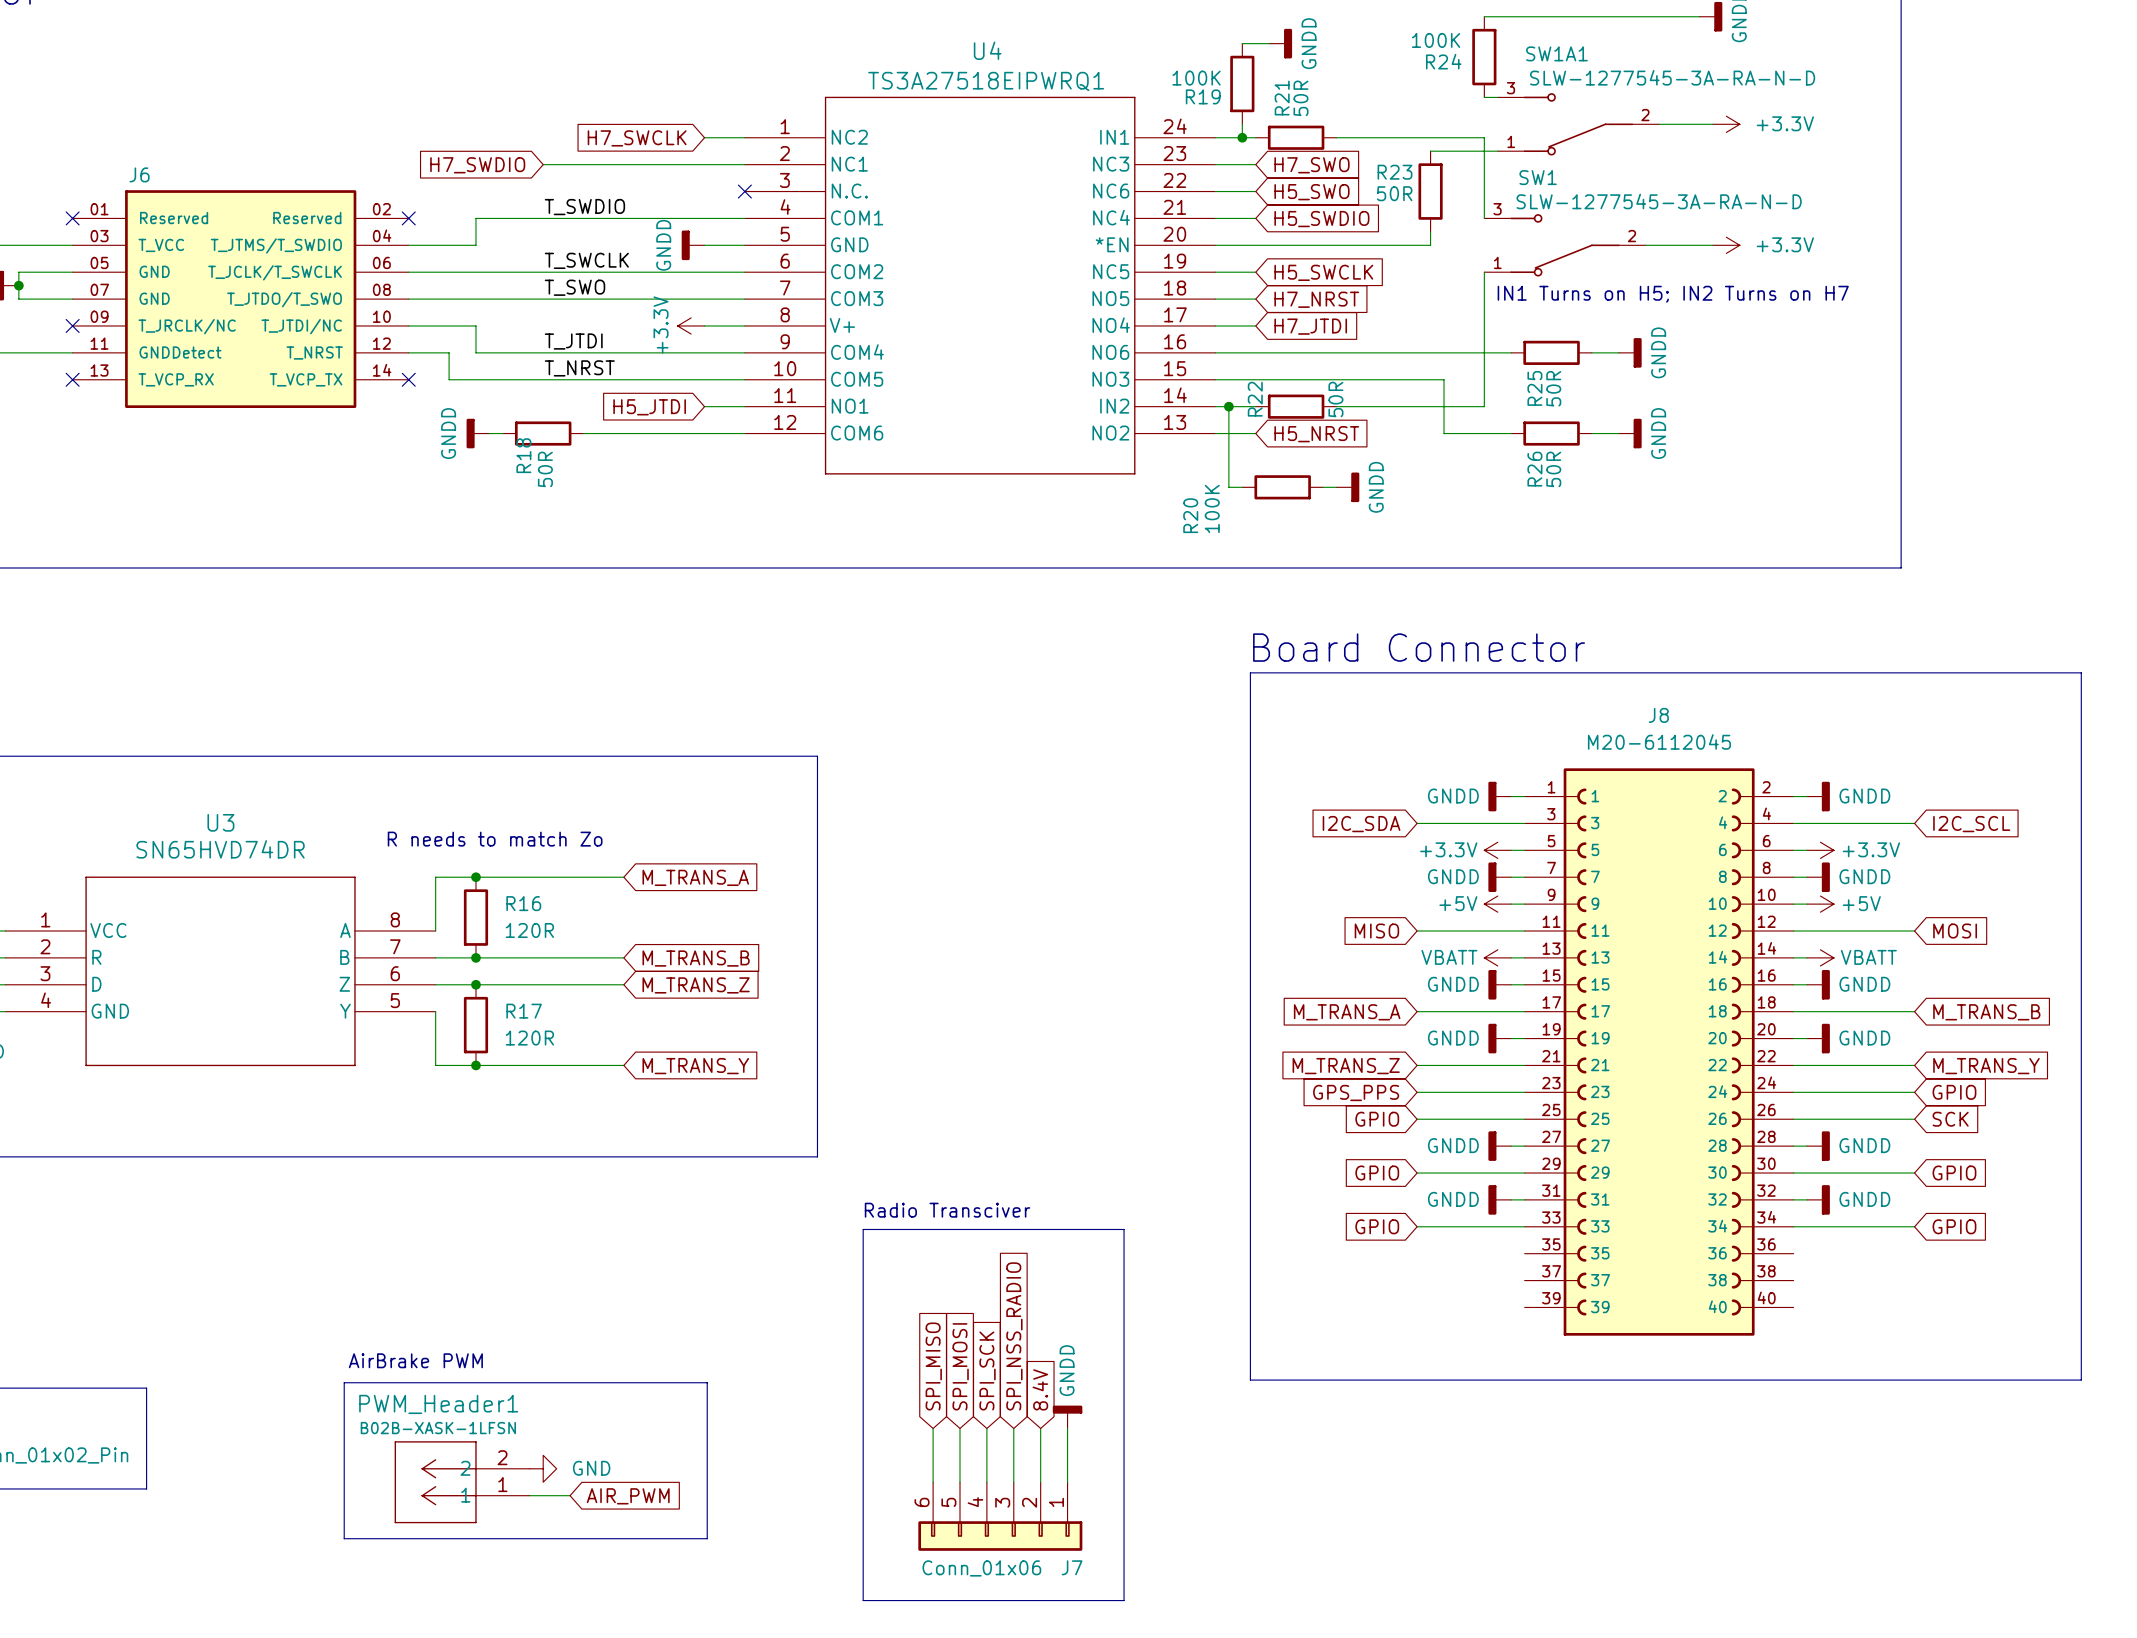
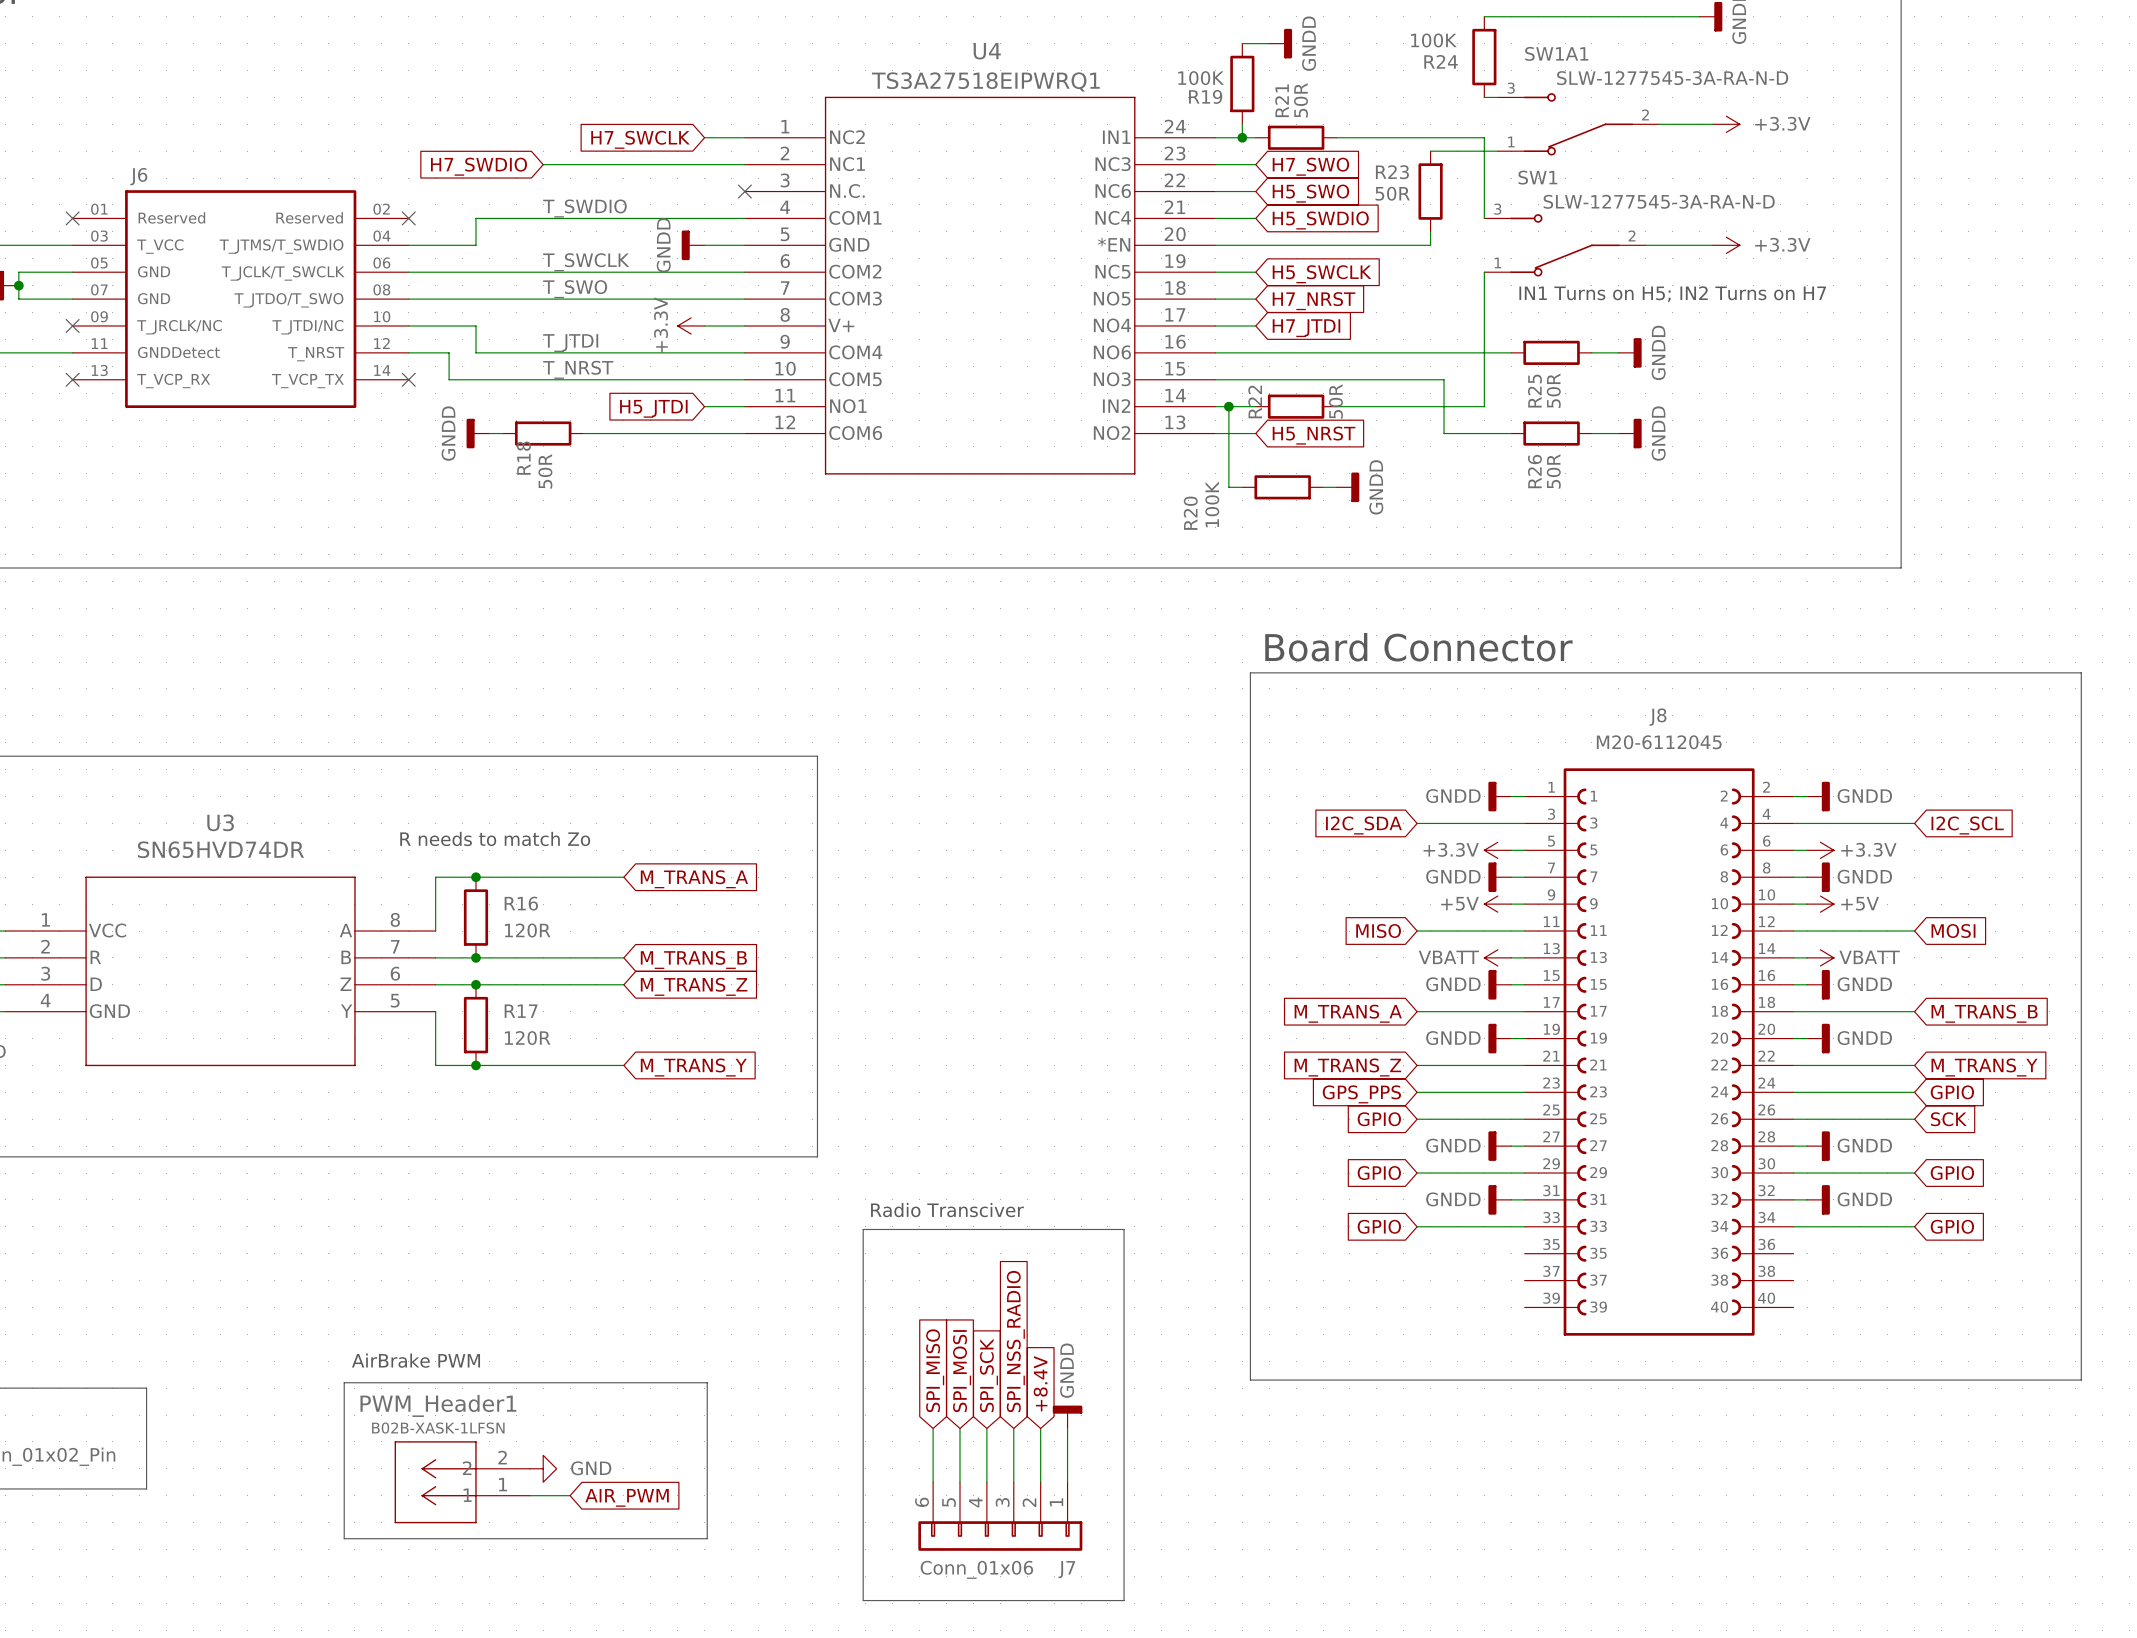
global label: 8.4V (1040, 1389) -> +8.4V (1040, 1383)

